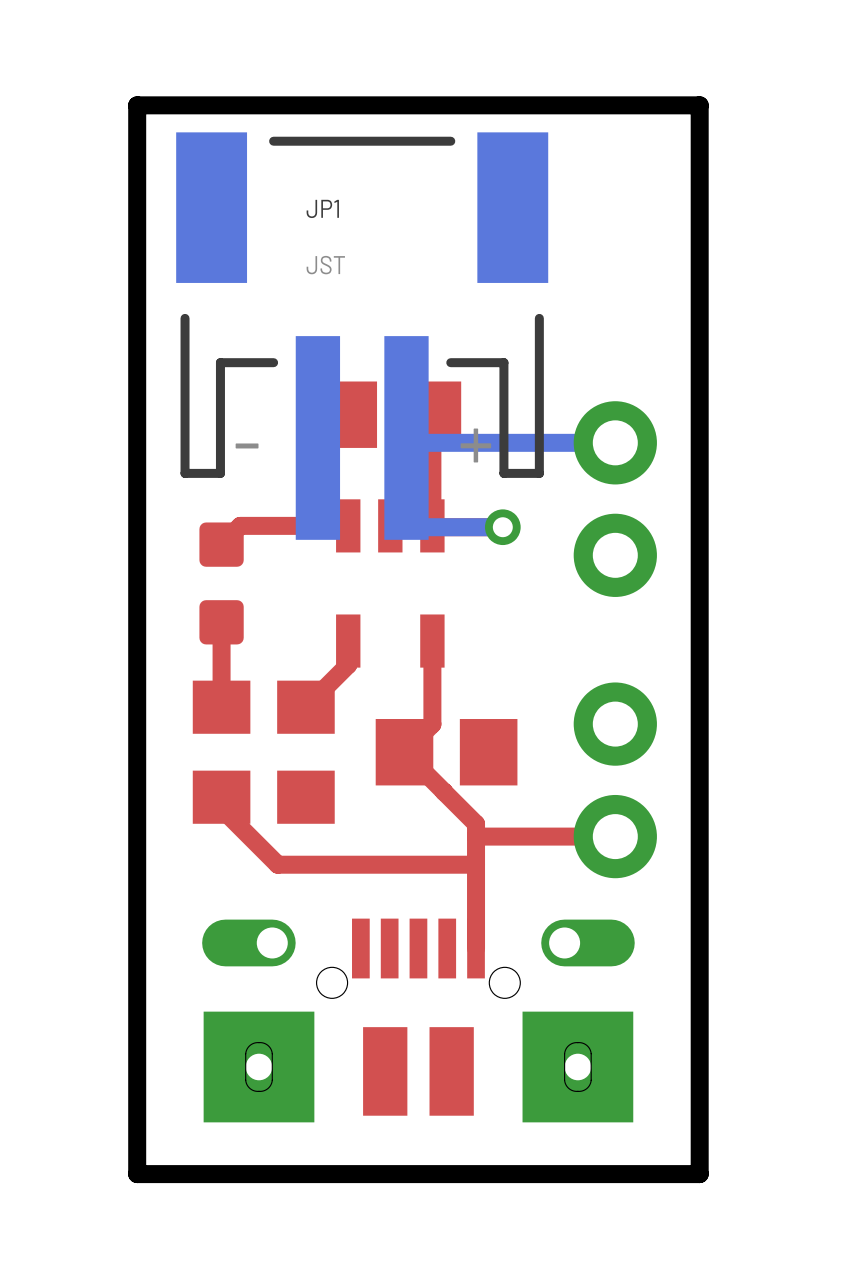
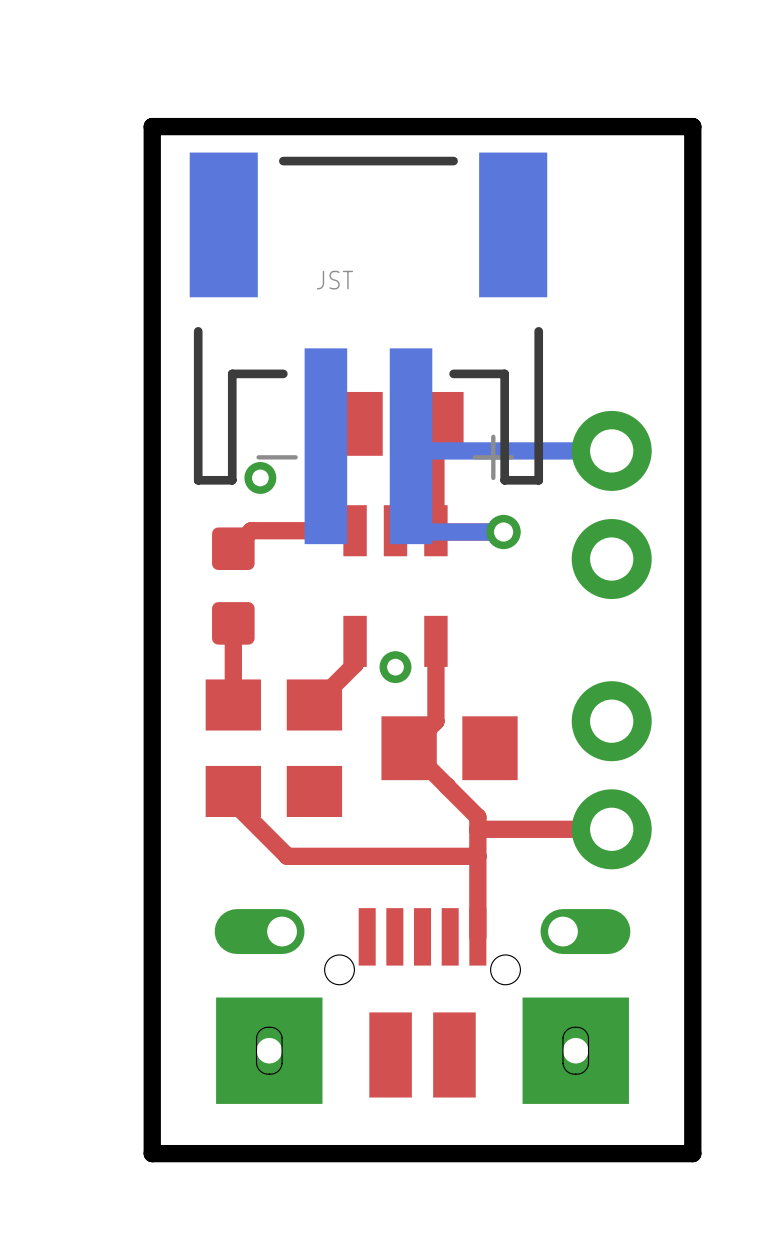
JP1 name: JP1 (322, 208) -> none
via: none -> (260, 477)
via: none -> (395, 667)

